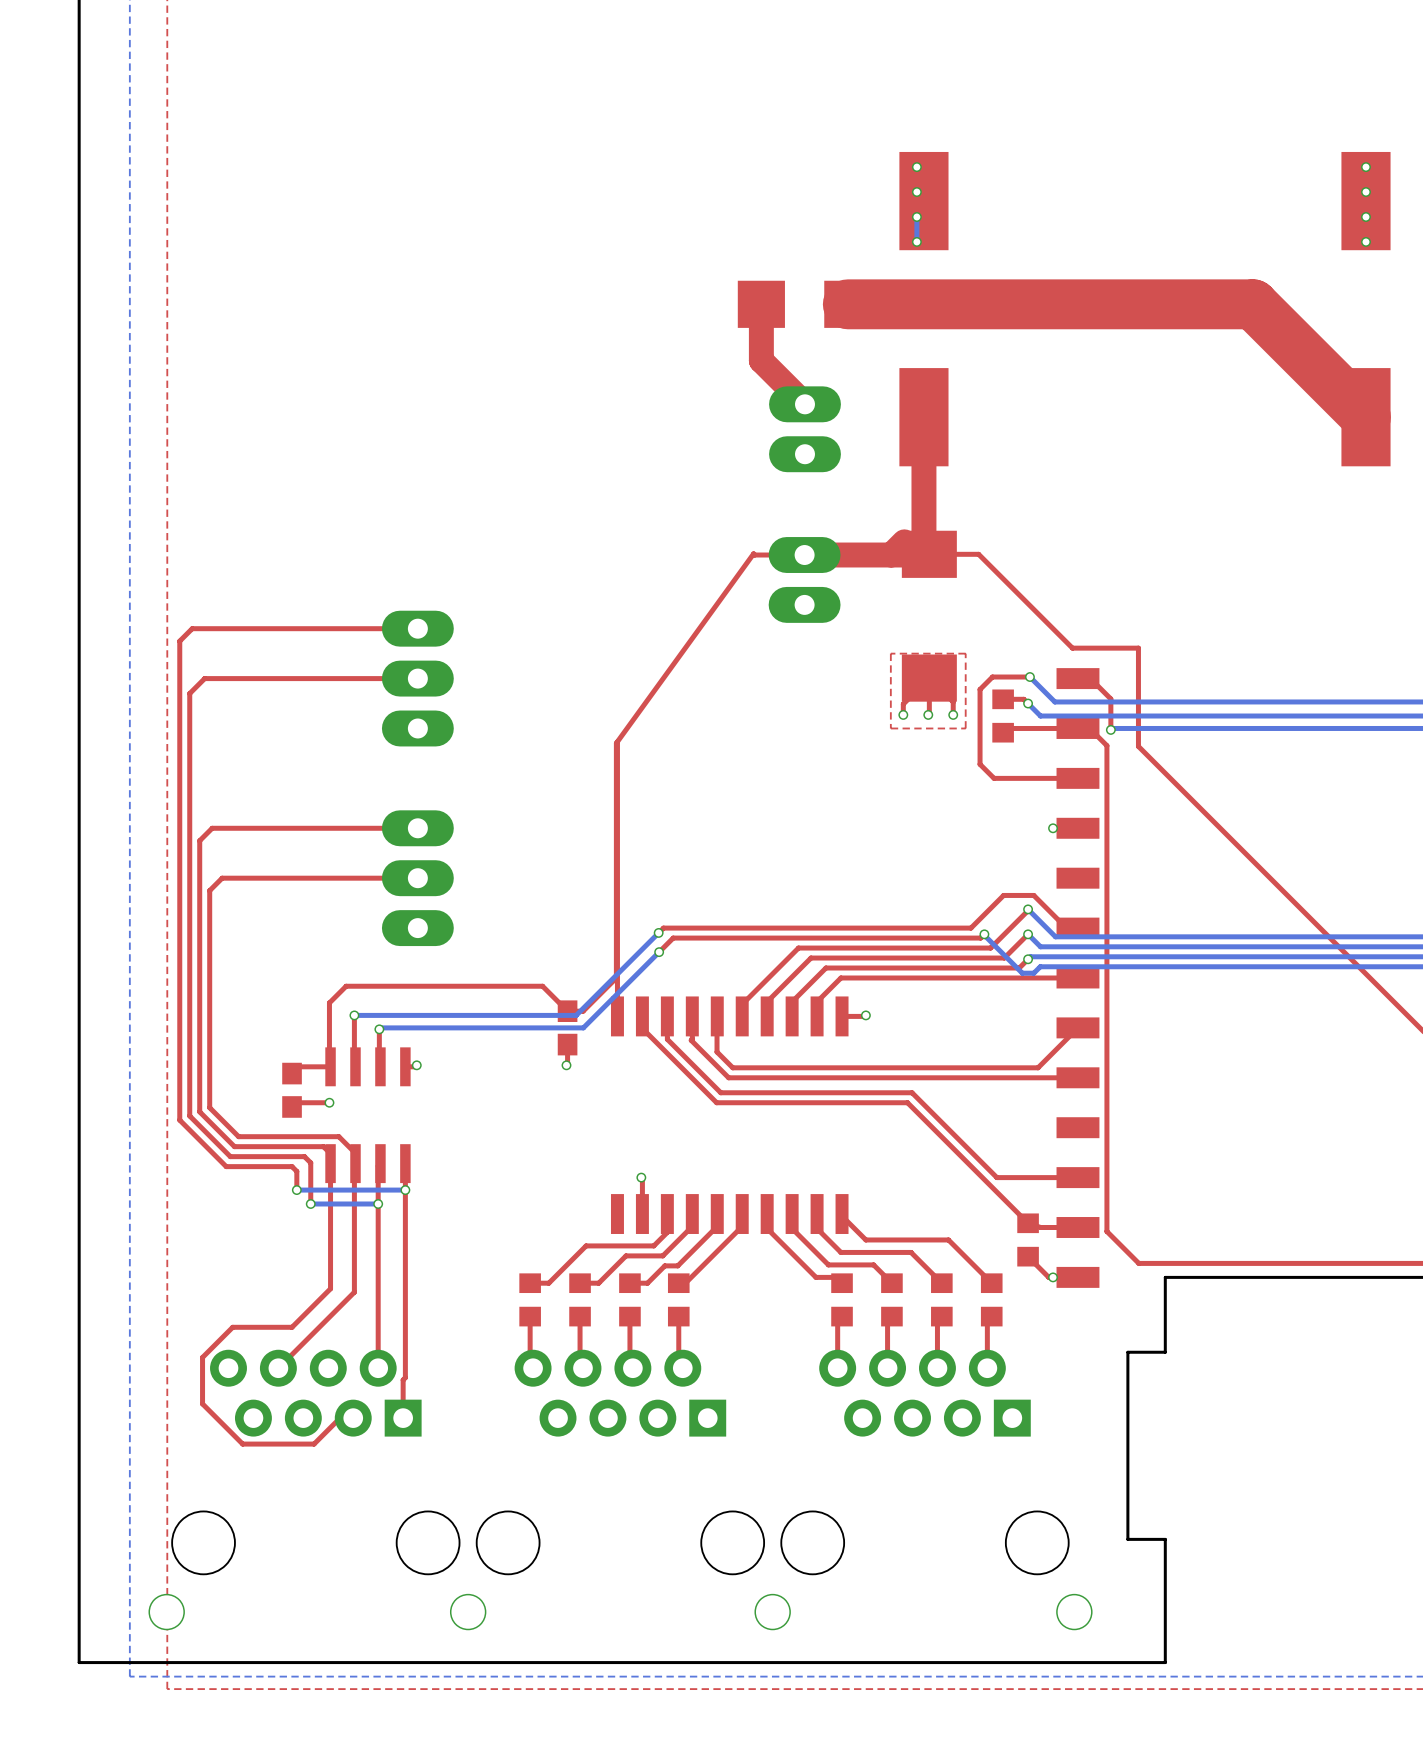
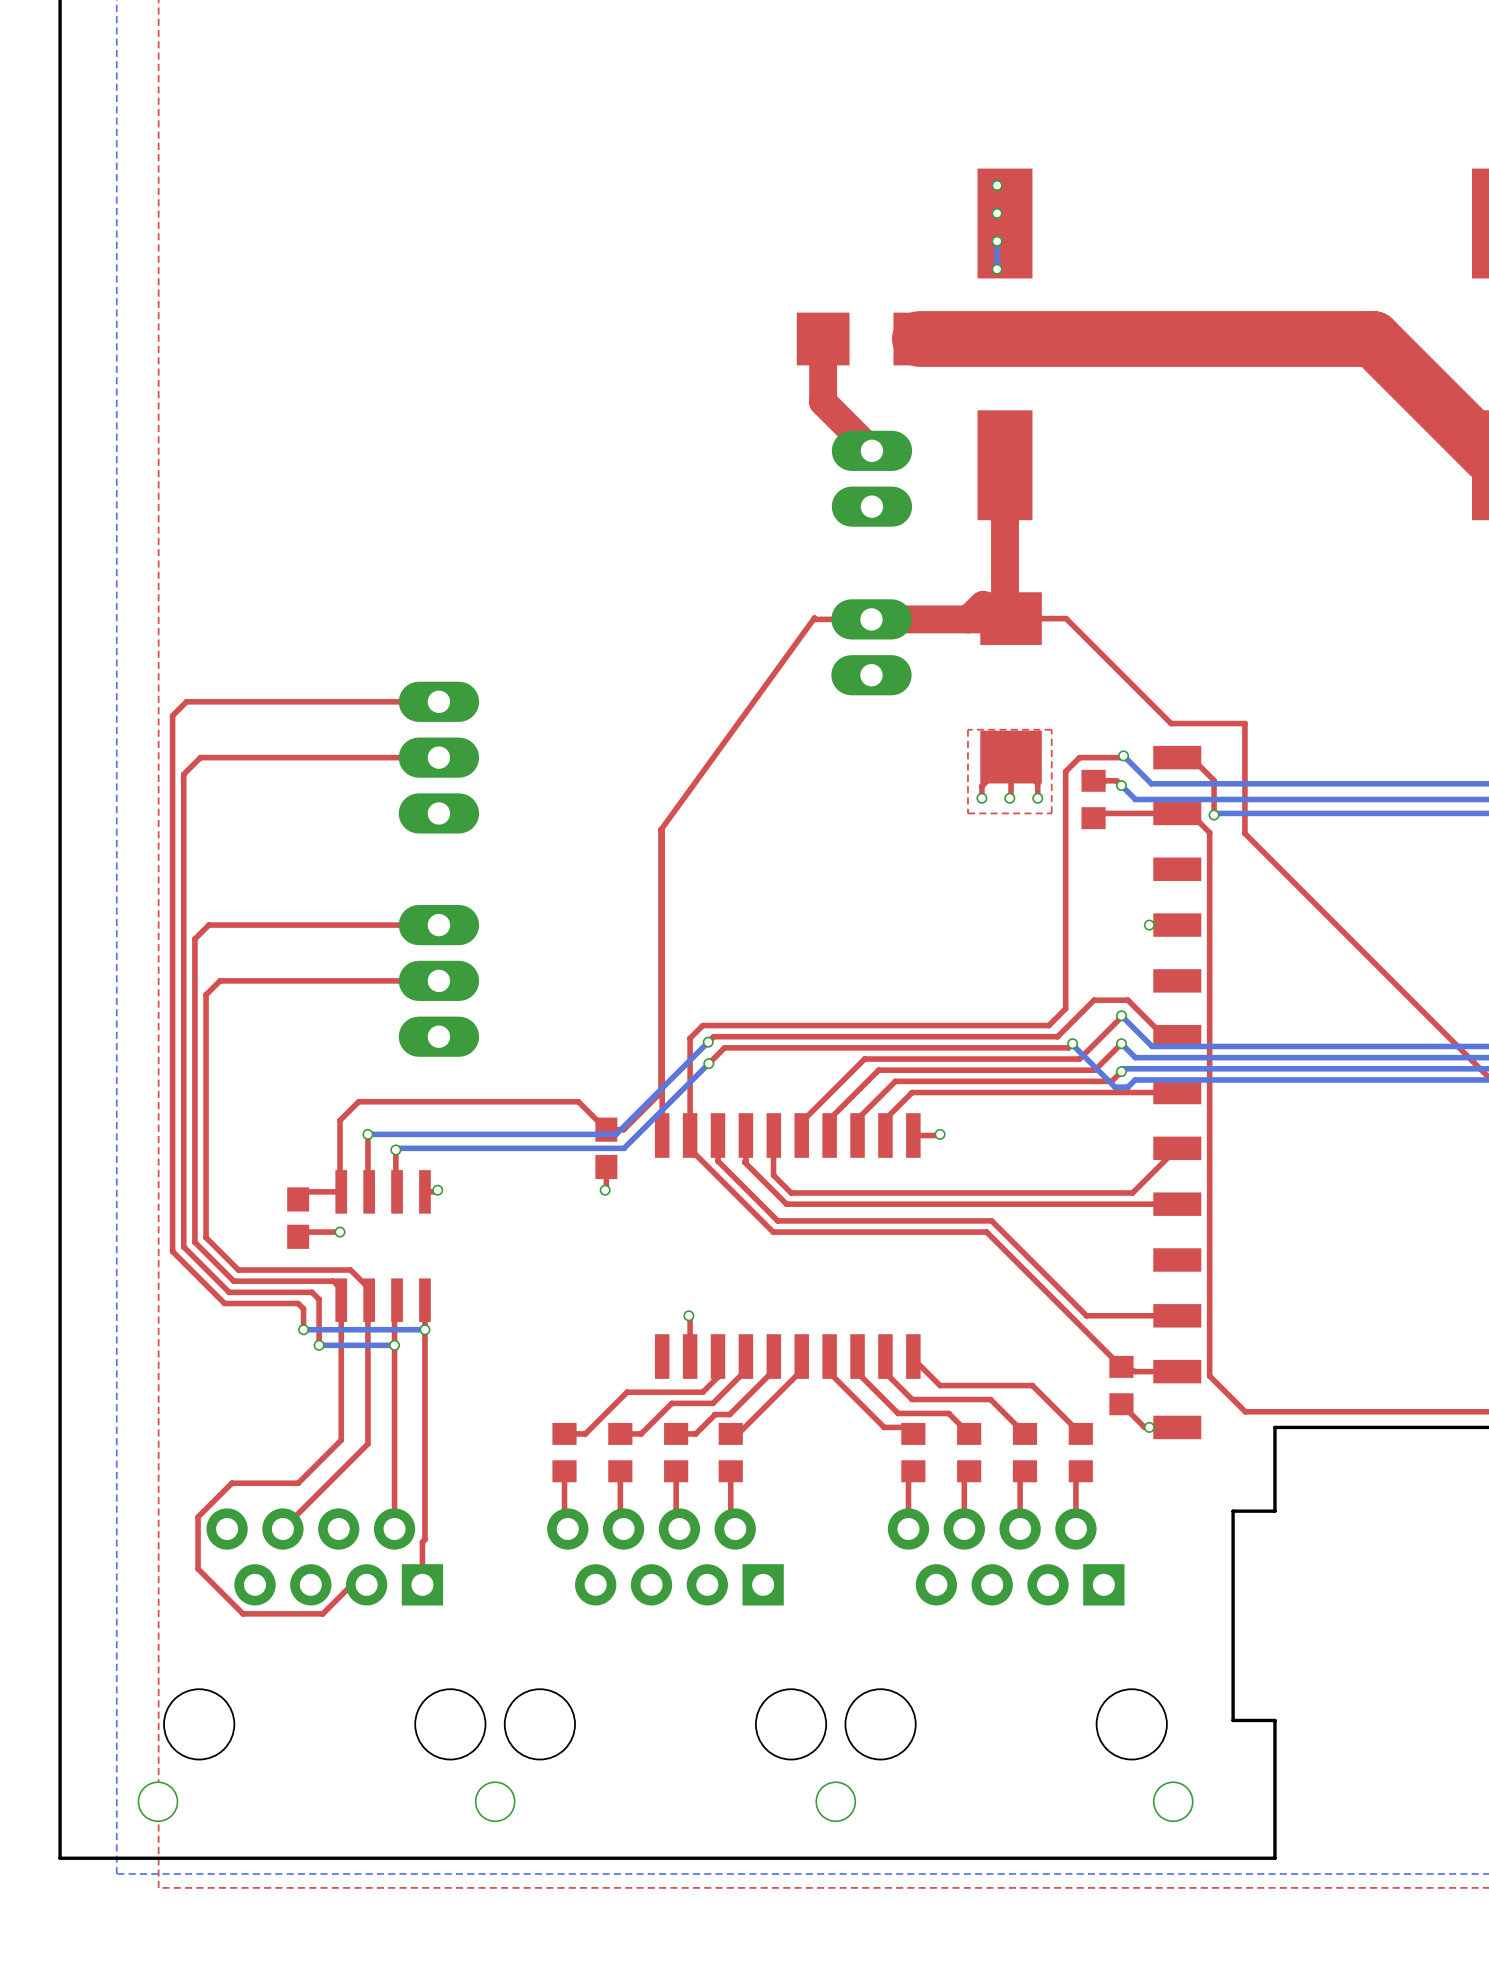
top track: (1029, 677) (992, 677) (980, 689) (980, 764) (994, 778) (1077, 778) -> none
top track: none -> (1121, 757) (1079, 757) (1065, 771) (1065, 1008) (1048, 1025) (702, 1025) (690, 1038) (690, 1135)

